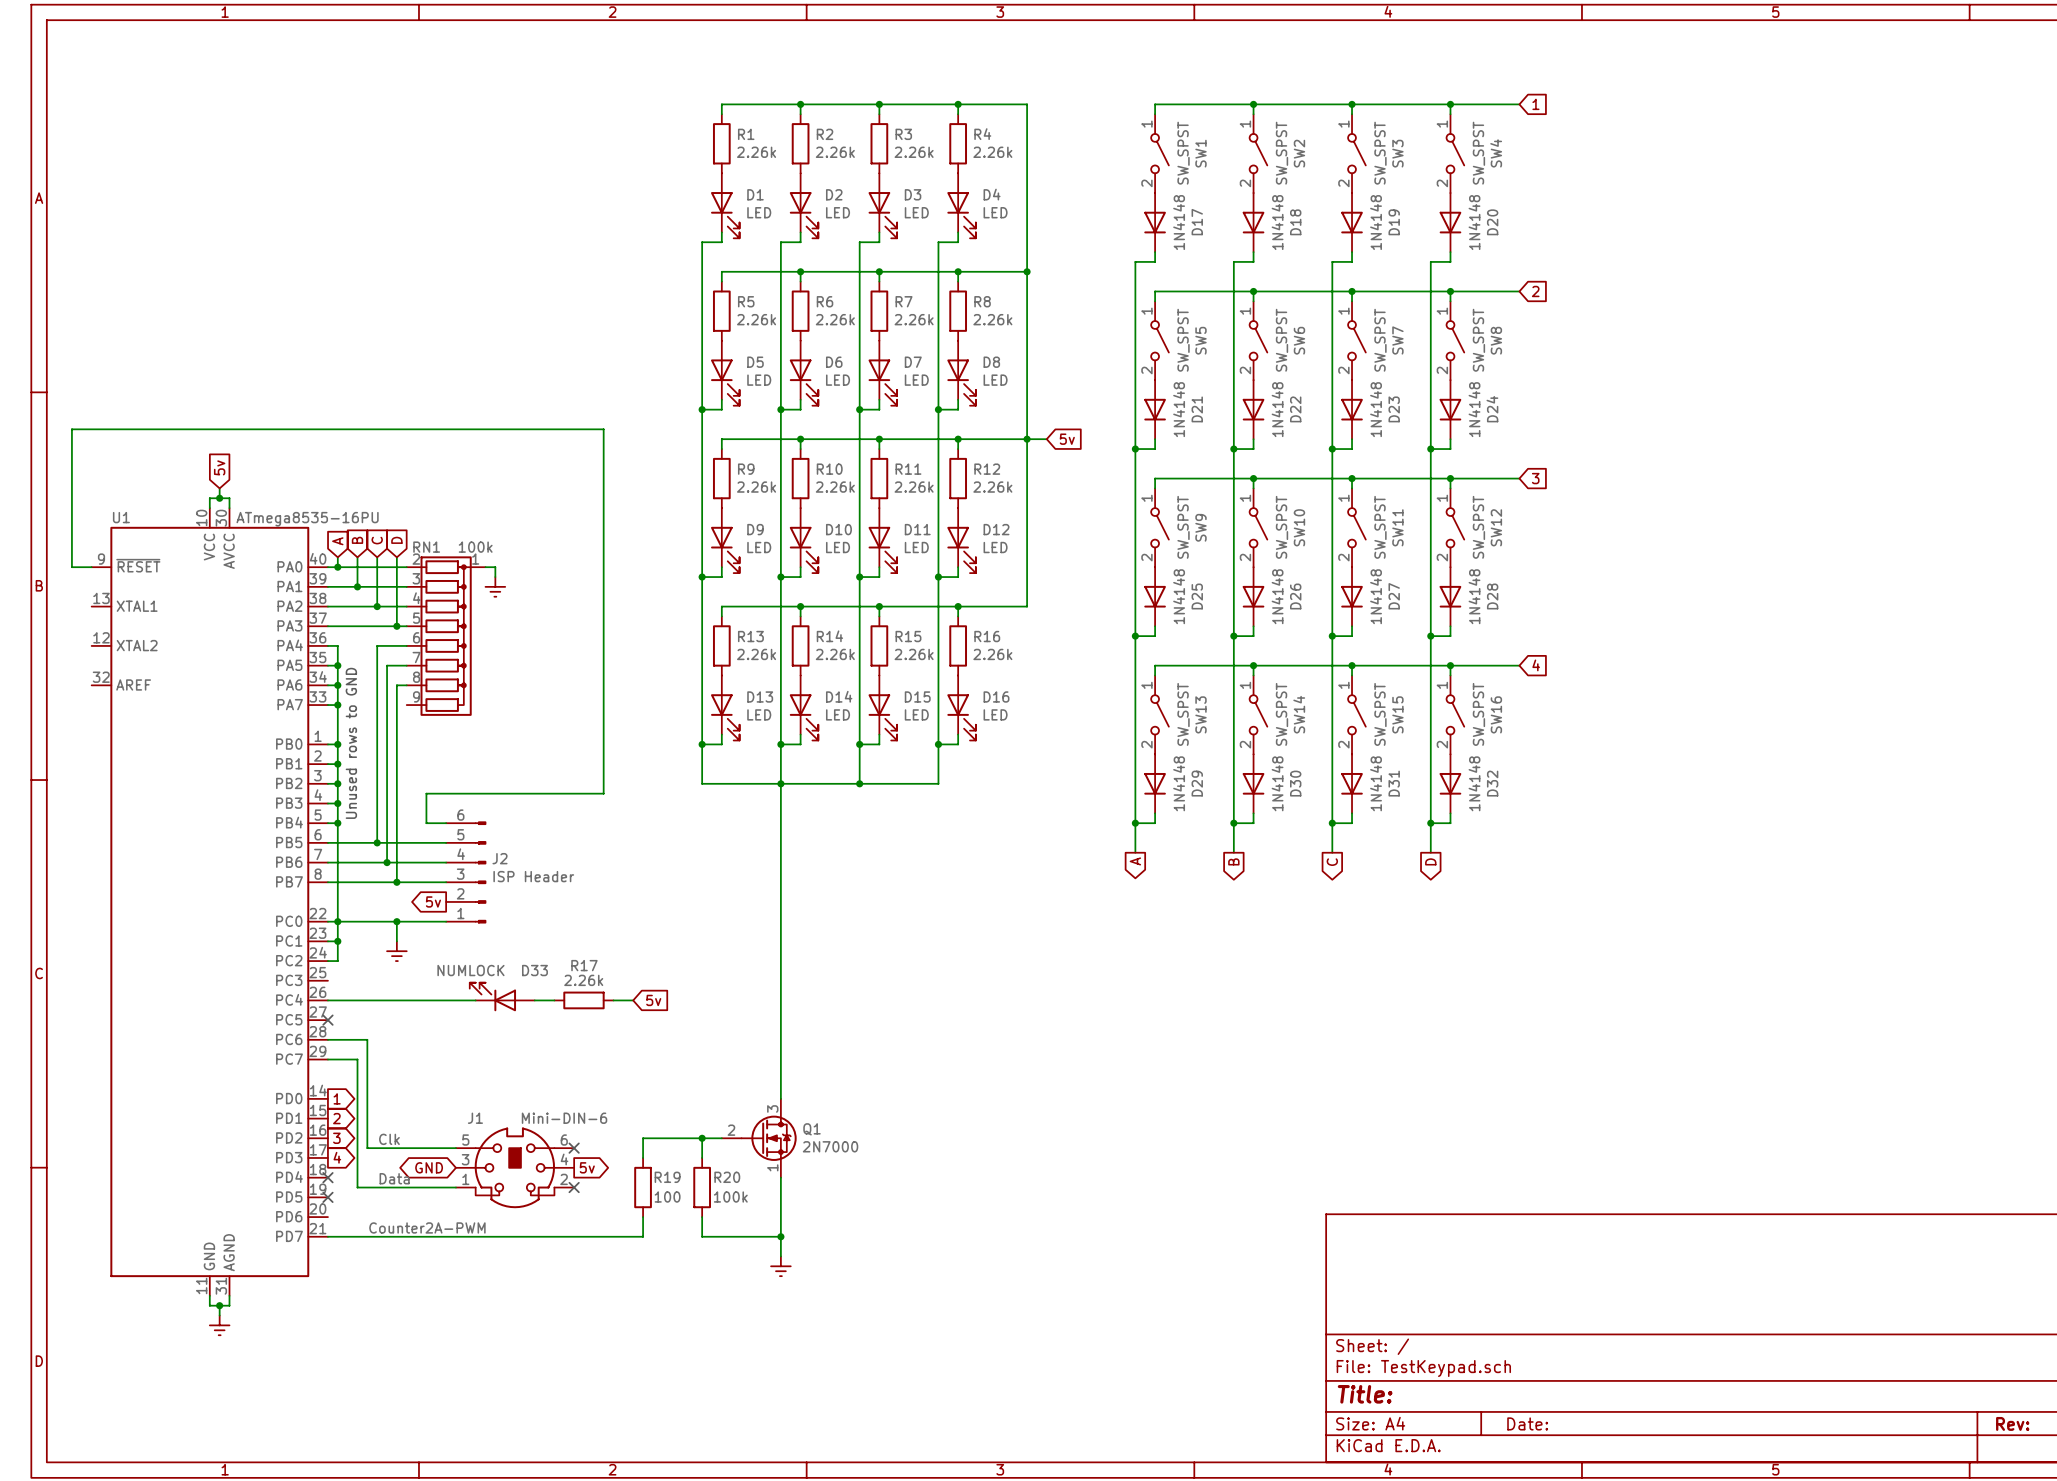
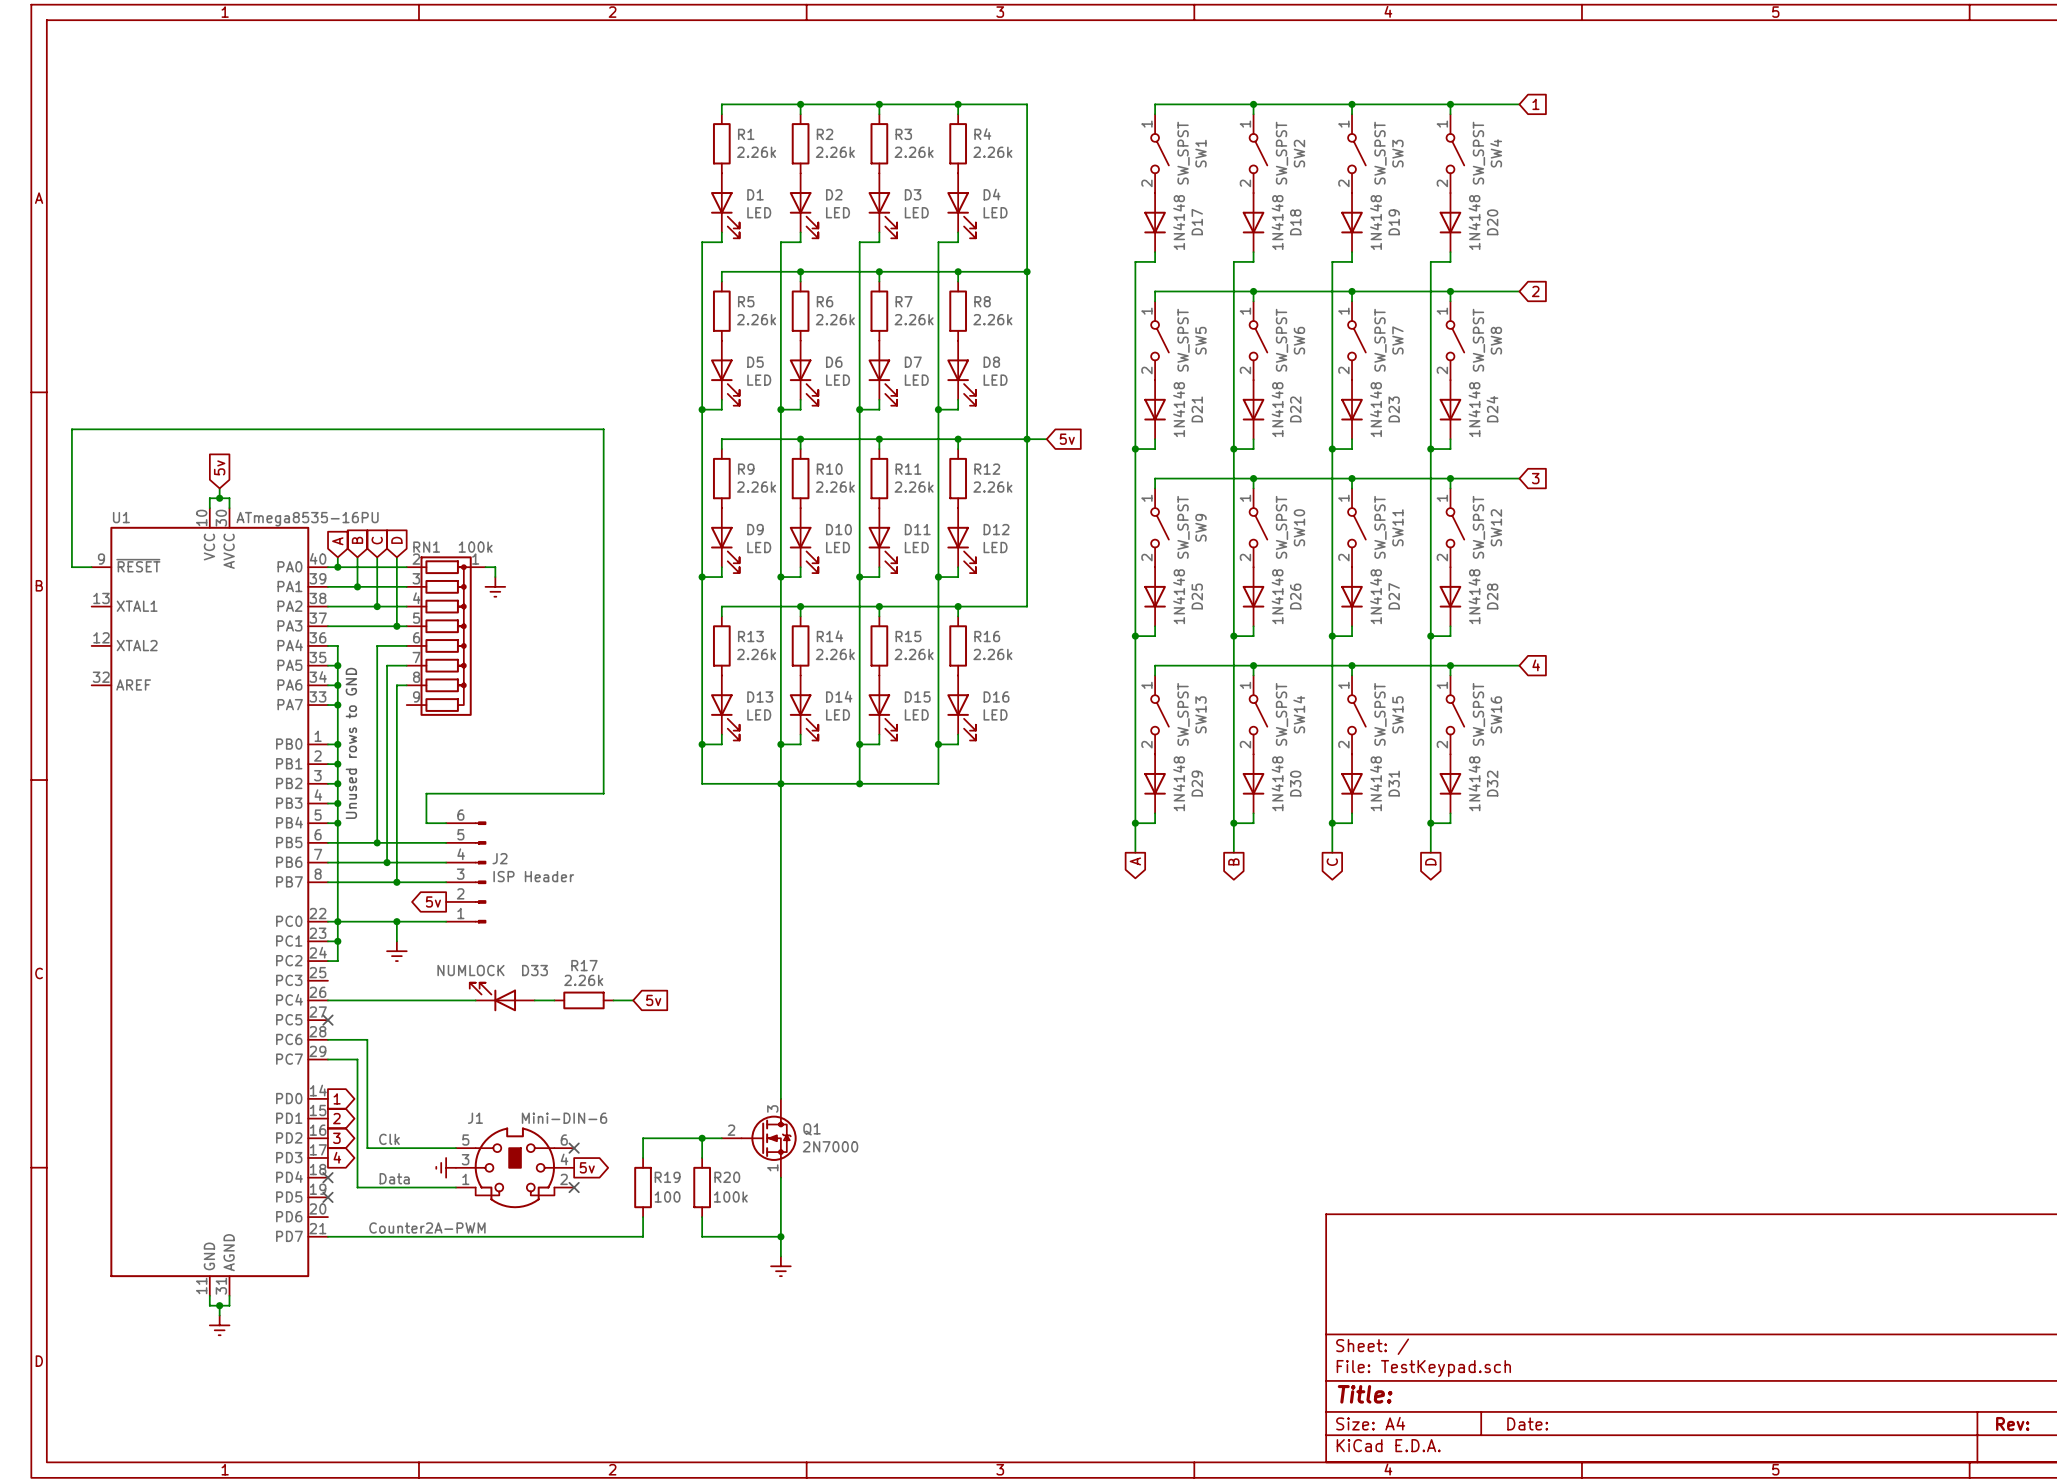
global label: GND (429, 1167) -> none
power symbol: none -> (446, 1167)

